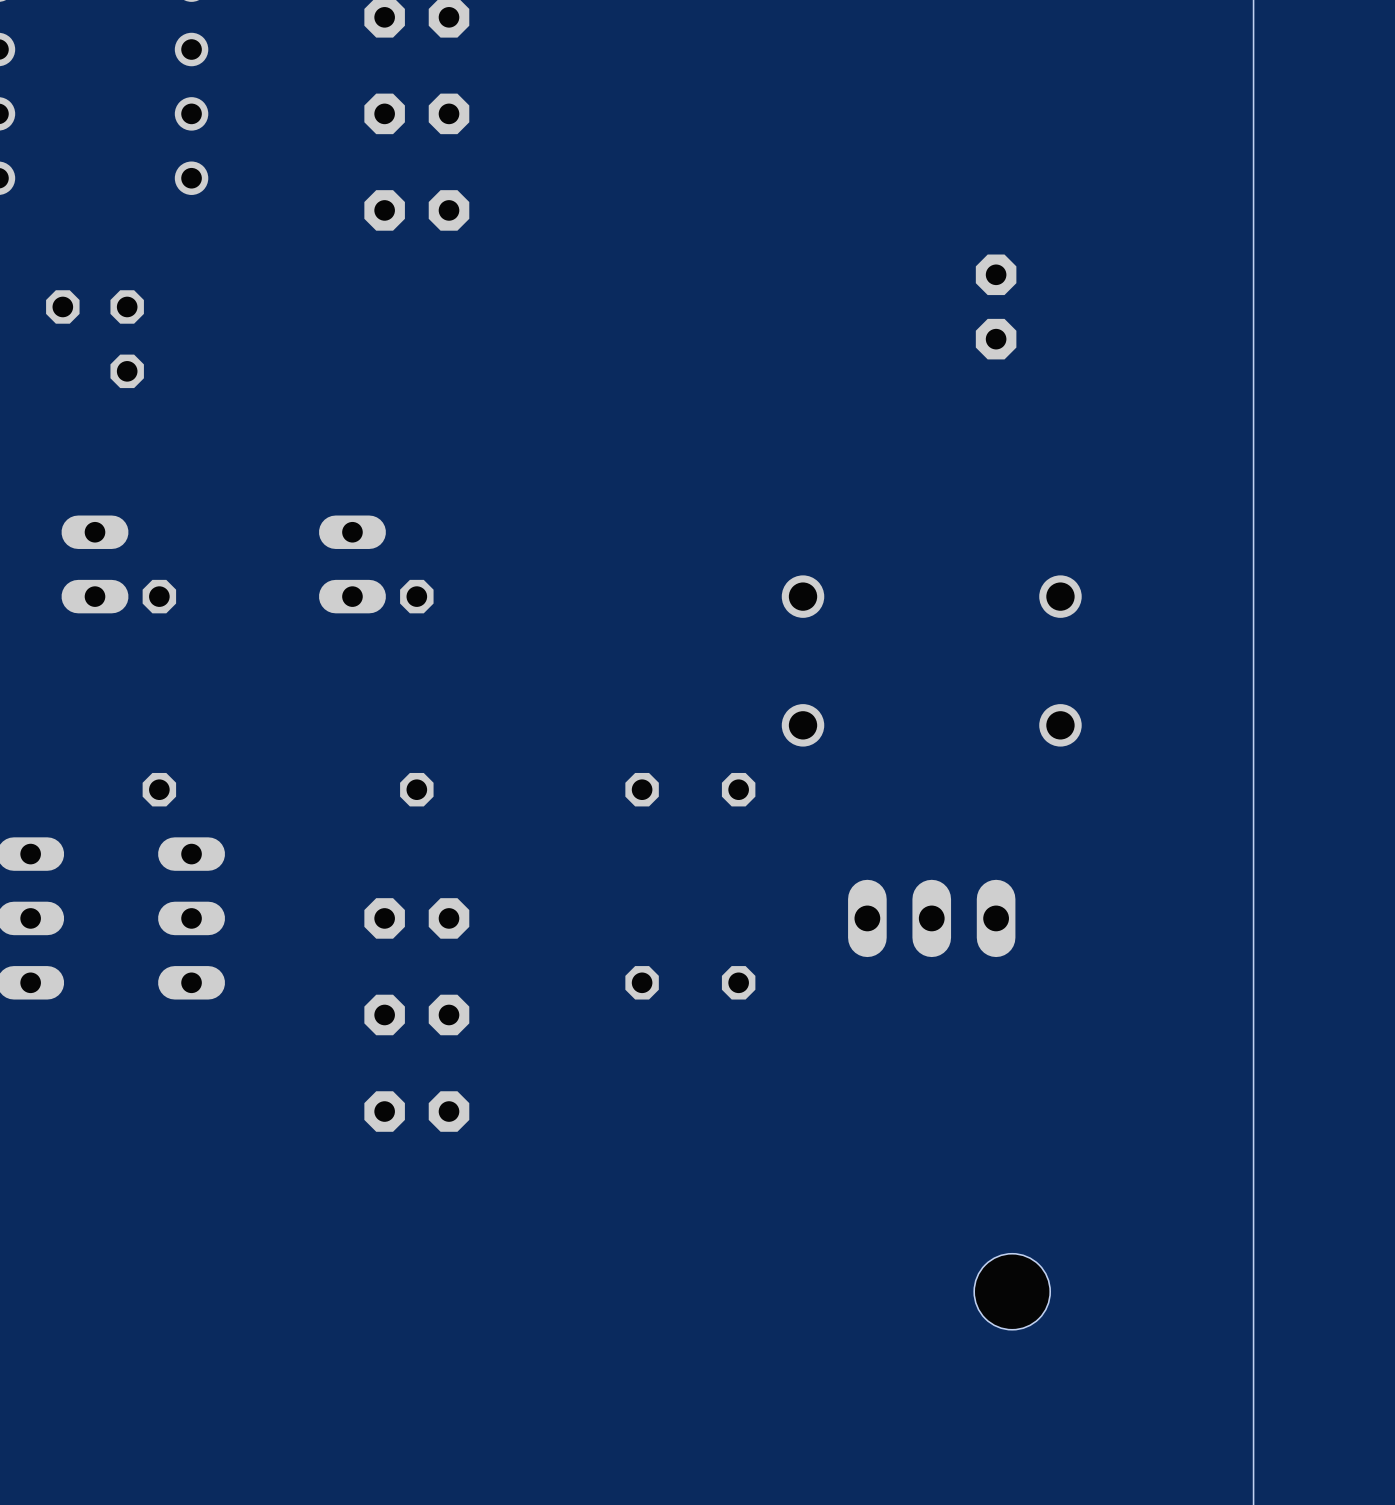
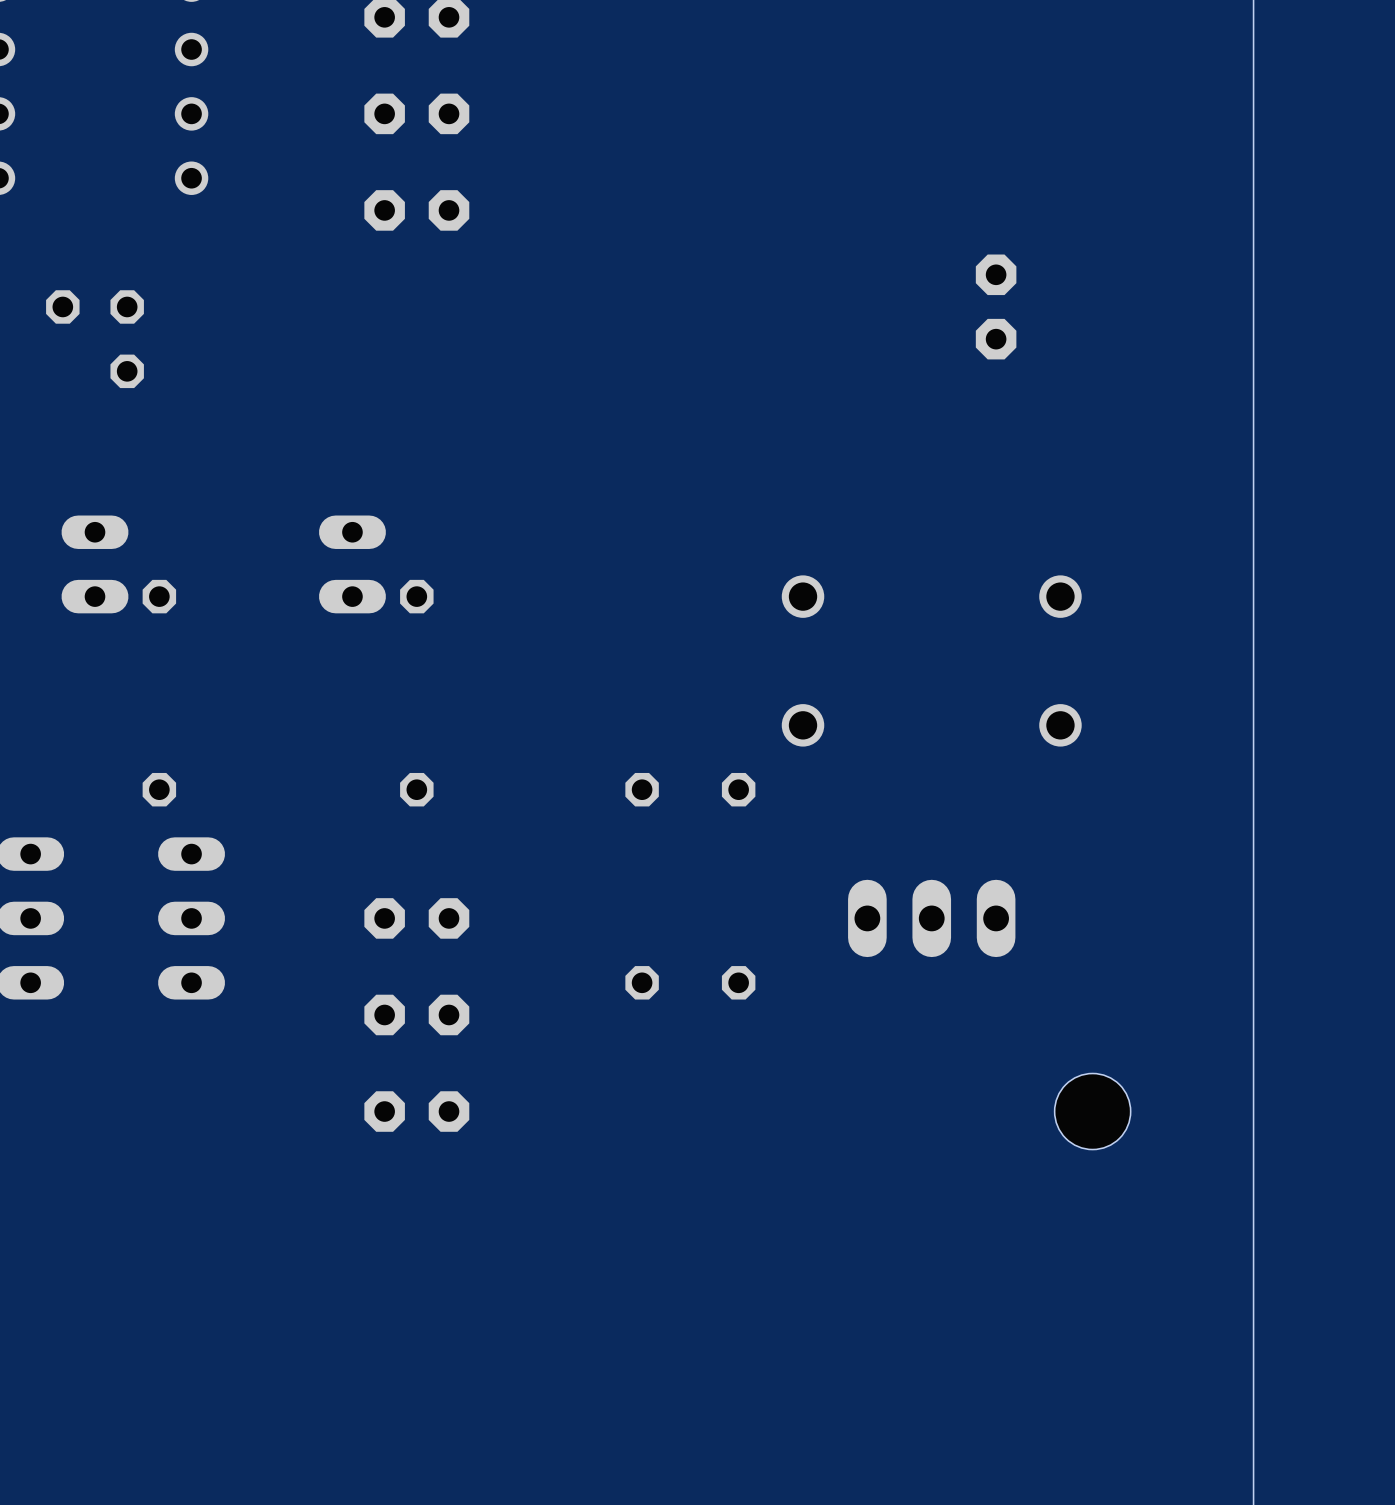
part position: (1012, 1291) -> (1092, 1111)

